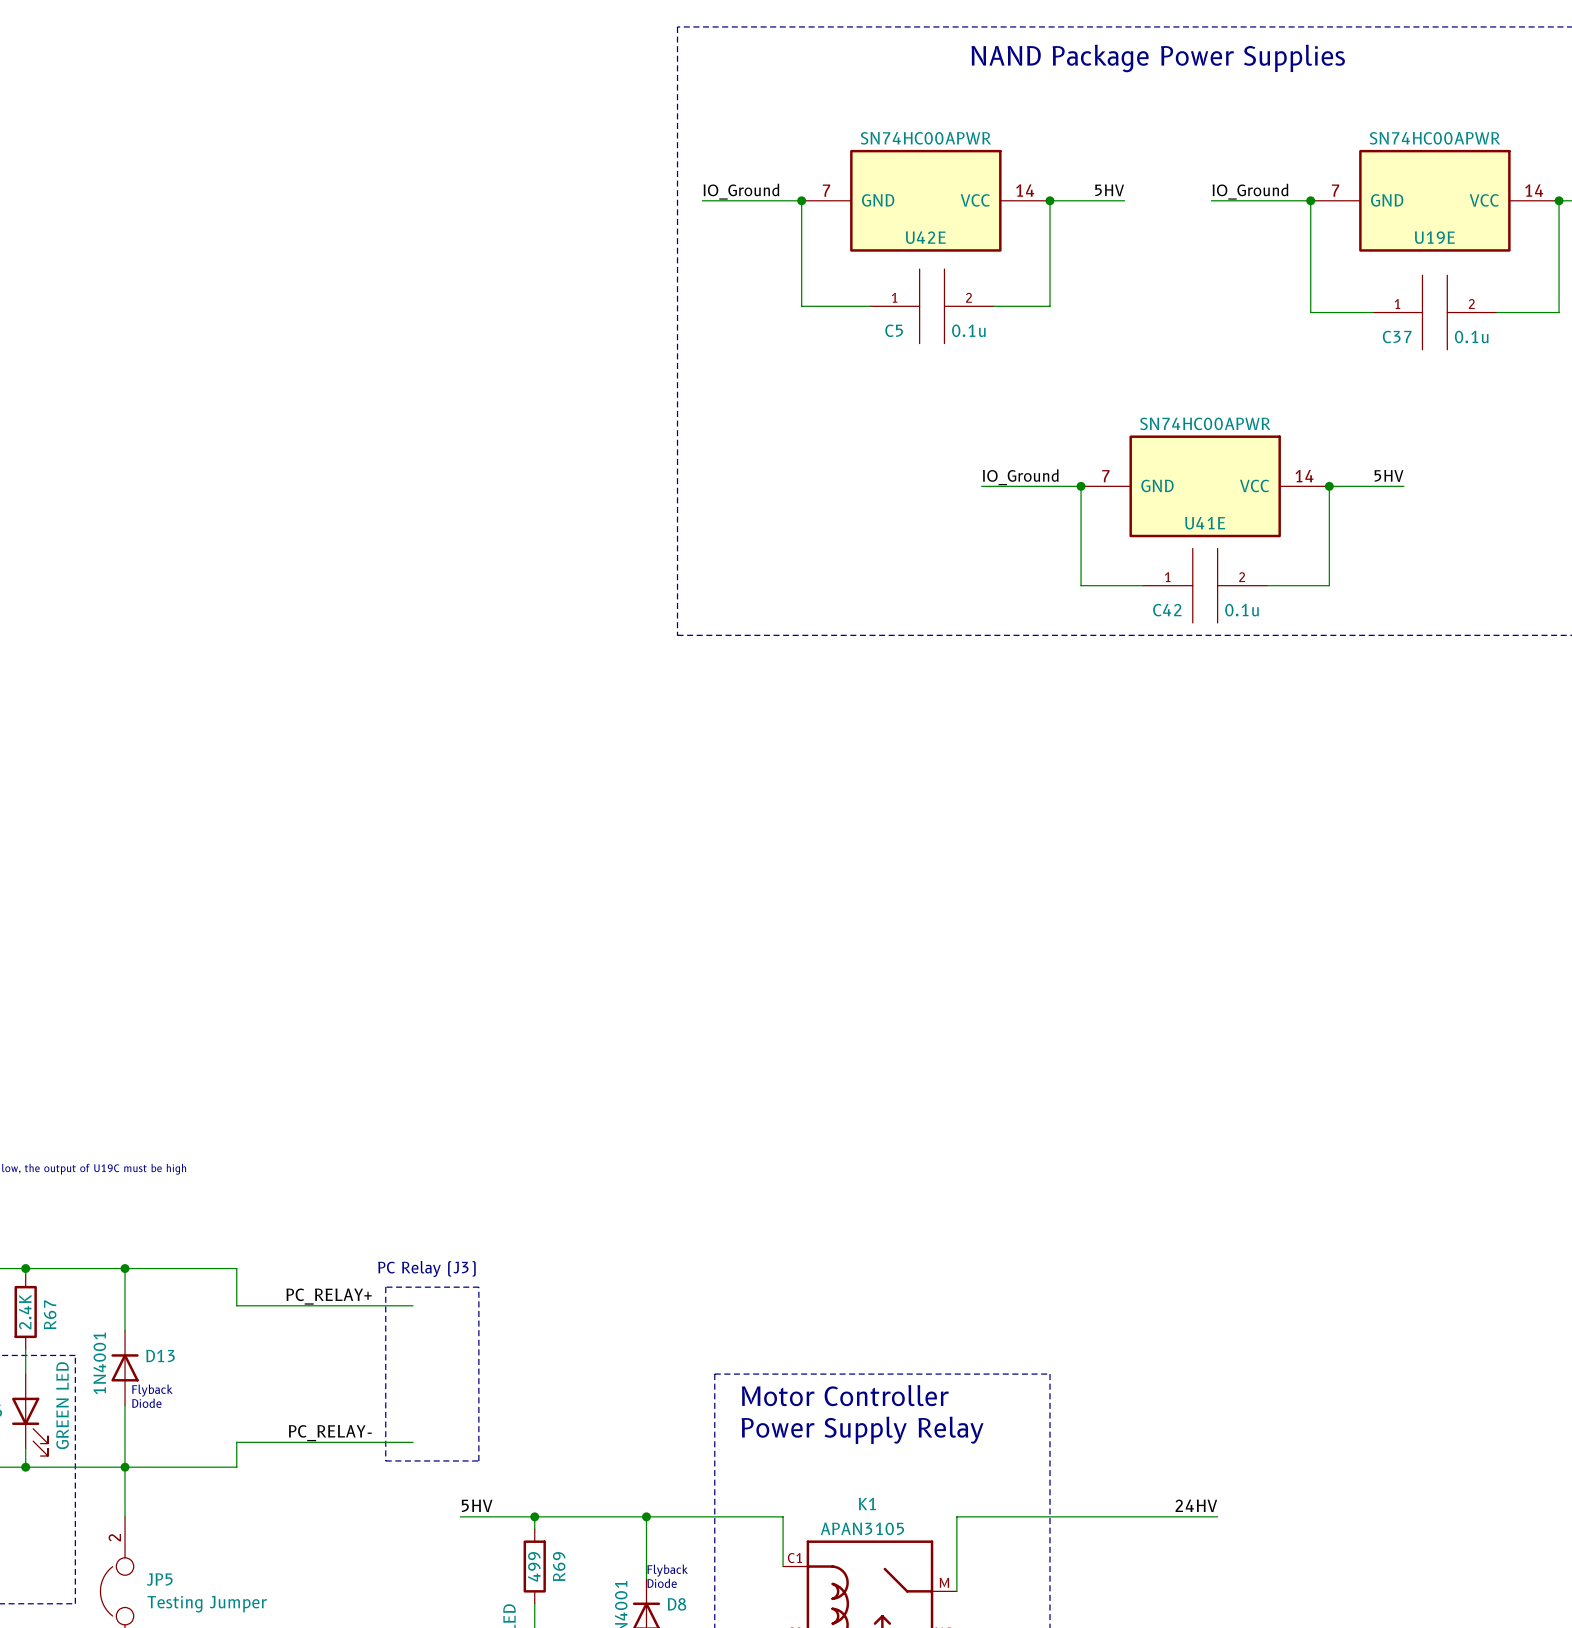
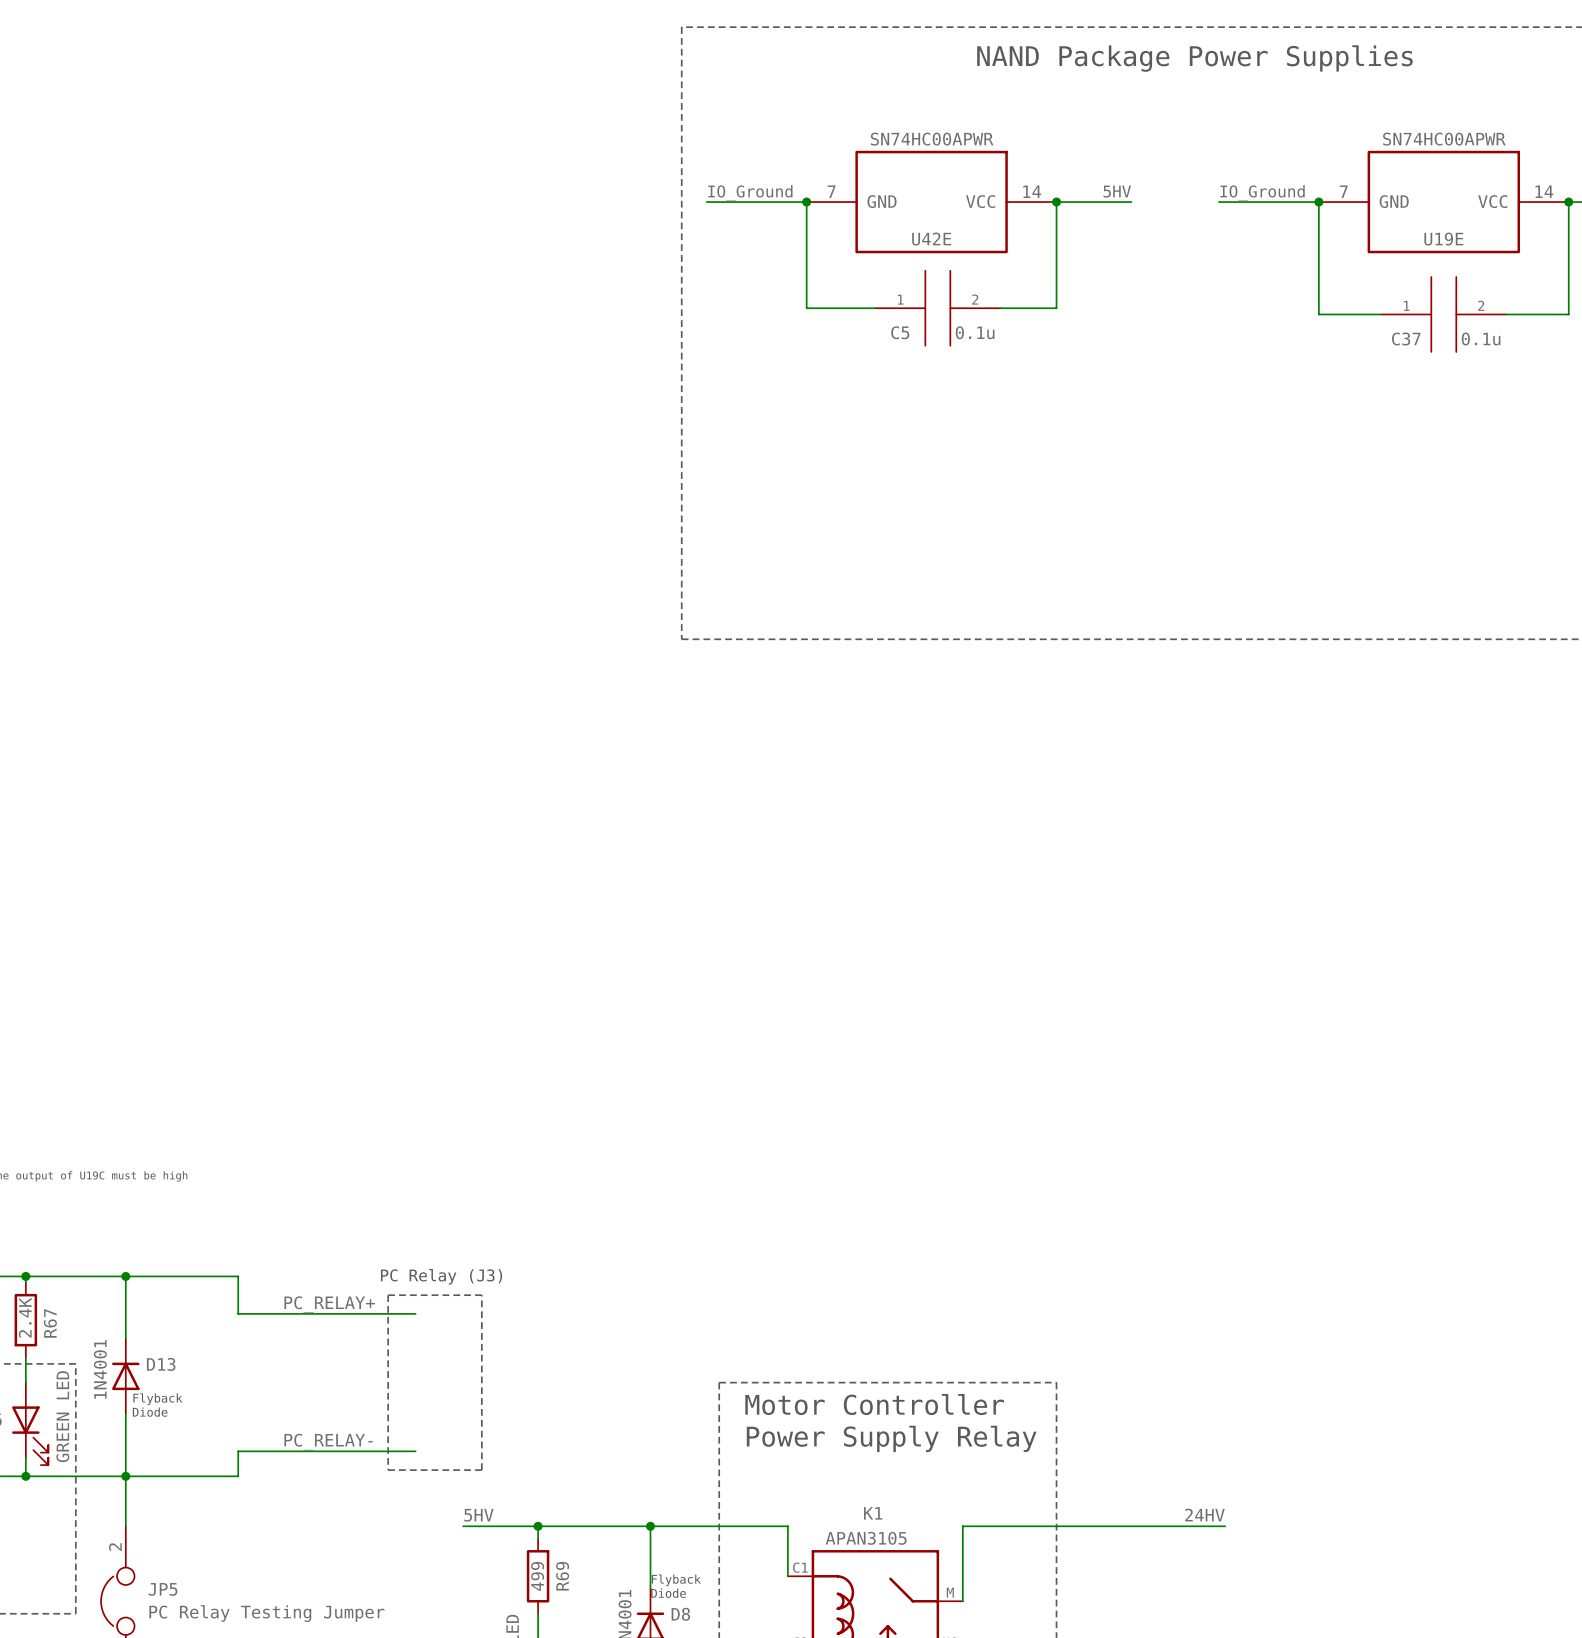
label: 5HV (1389, 475) -> none
label: IO_Ground (1020, 477) -> none
wire: (981, 486) (1081, 486) (1081, 585) (1143, 585) -> none
junction: (1081, 486) -> none
U41E: SN74HC00APWR (1205, 486) -> none
junction: (1329, 486) -> none
wire: (1403, 486) (1329, 486) (1329, 585) (1267, 585) -> none
C42: 0.1u (1205, 585) -> none
JP5 value: Testing Jumper (207, 1604) -> PC Relay Testing Jumper (266, 1613)

